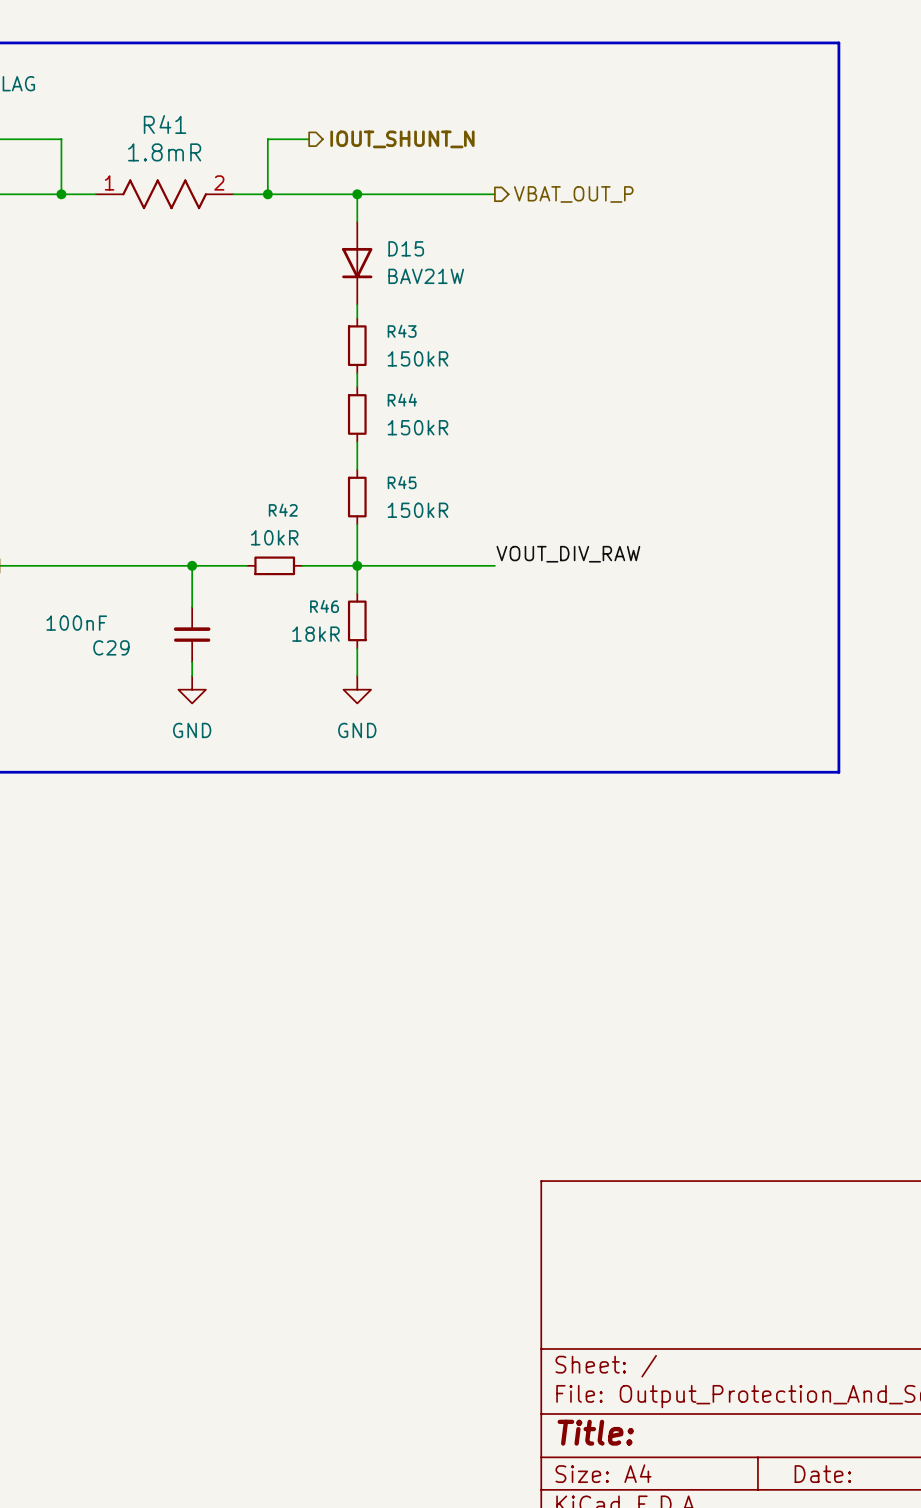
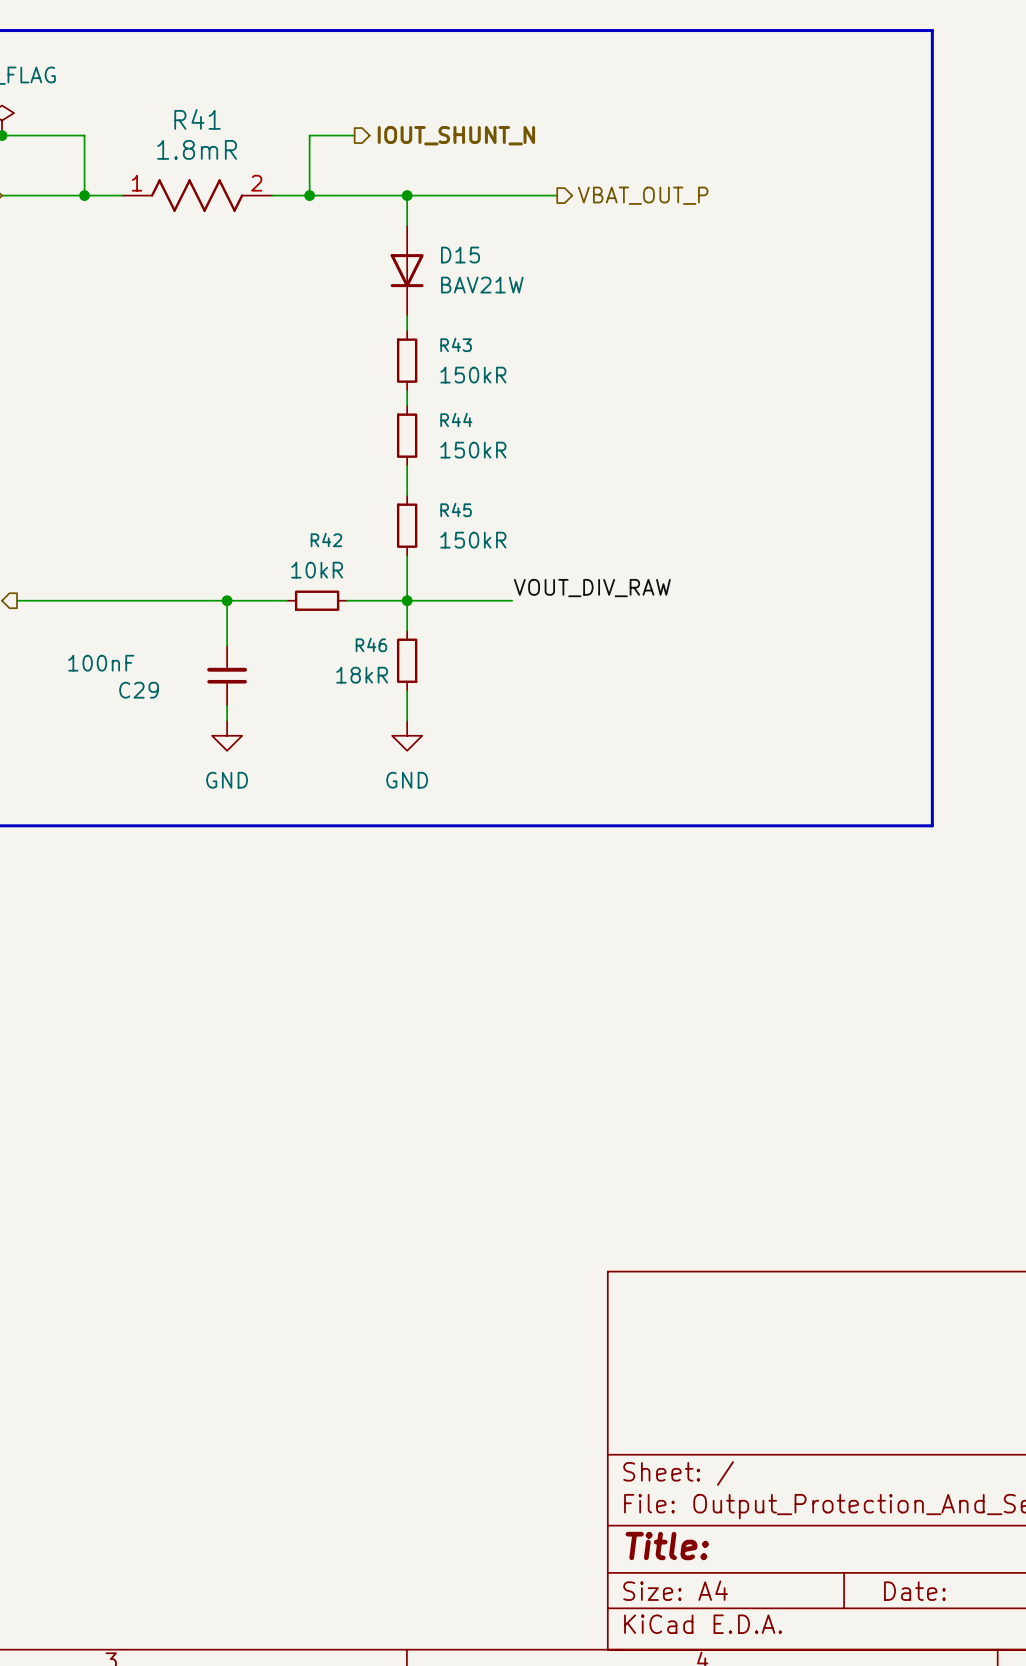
label position: VOUT_DIV_RAW (568, 554) -> VOUT_DIV_RAW (592, 588)
wire: (453, 565) (494, 565) -> none

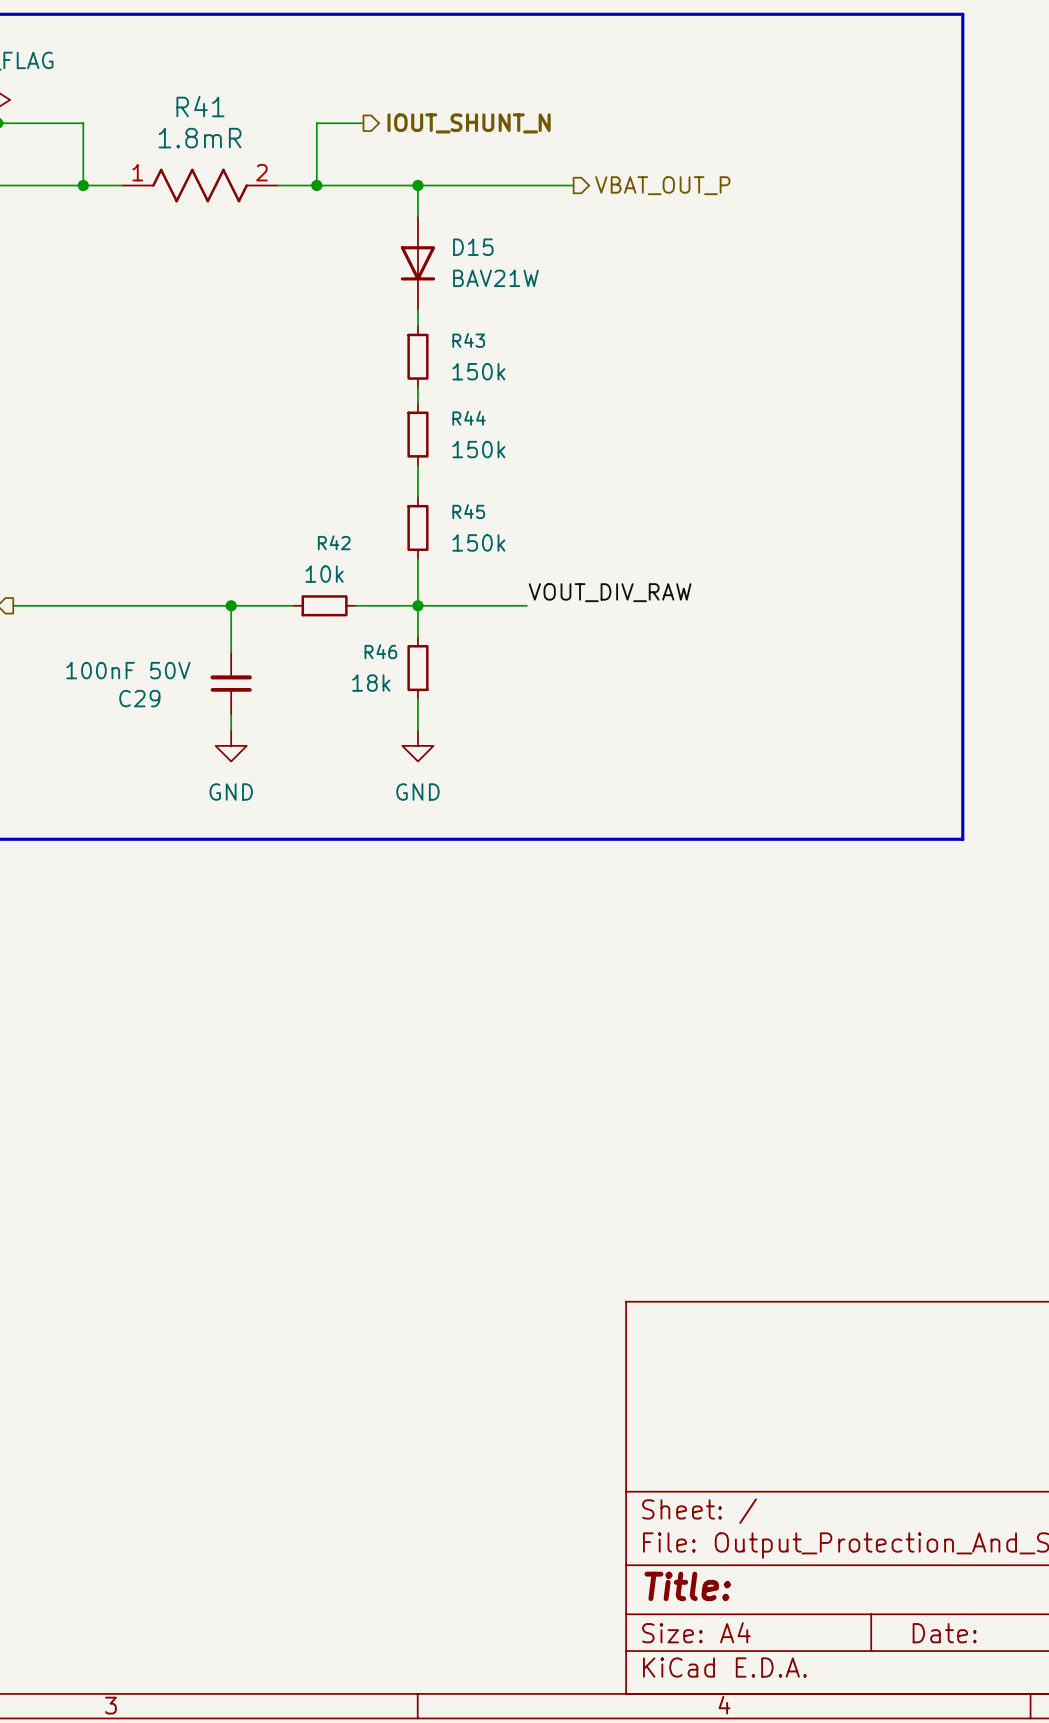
R43 value: 150kR (473, 375) -> 150k (478, 371)
R44 value: 150kR (473, 450) -> 150k (478, 449)
R45 value: 150kR (473, 540) -> 150k (478, 542)
R42 value: 10kR (317, 570) -> 10k (324, 574)
C29 value: 100nF (101, 663) -> 100nF 50V (128, 670)
R46 value: 18kR (362, 675) -> 18k (371, 683)

